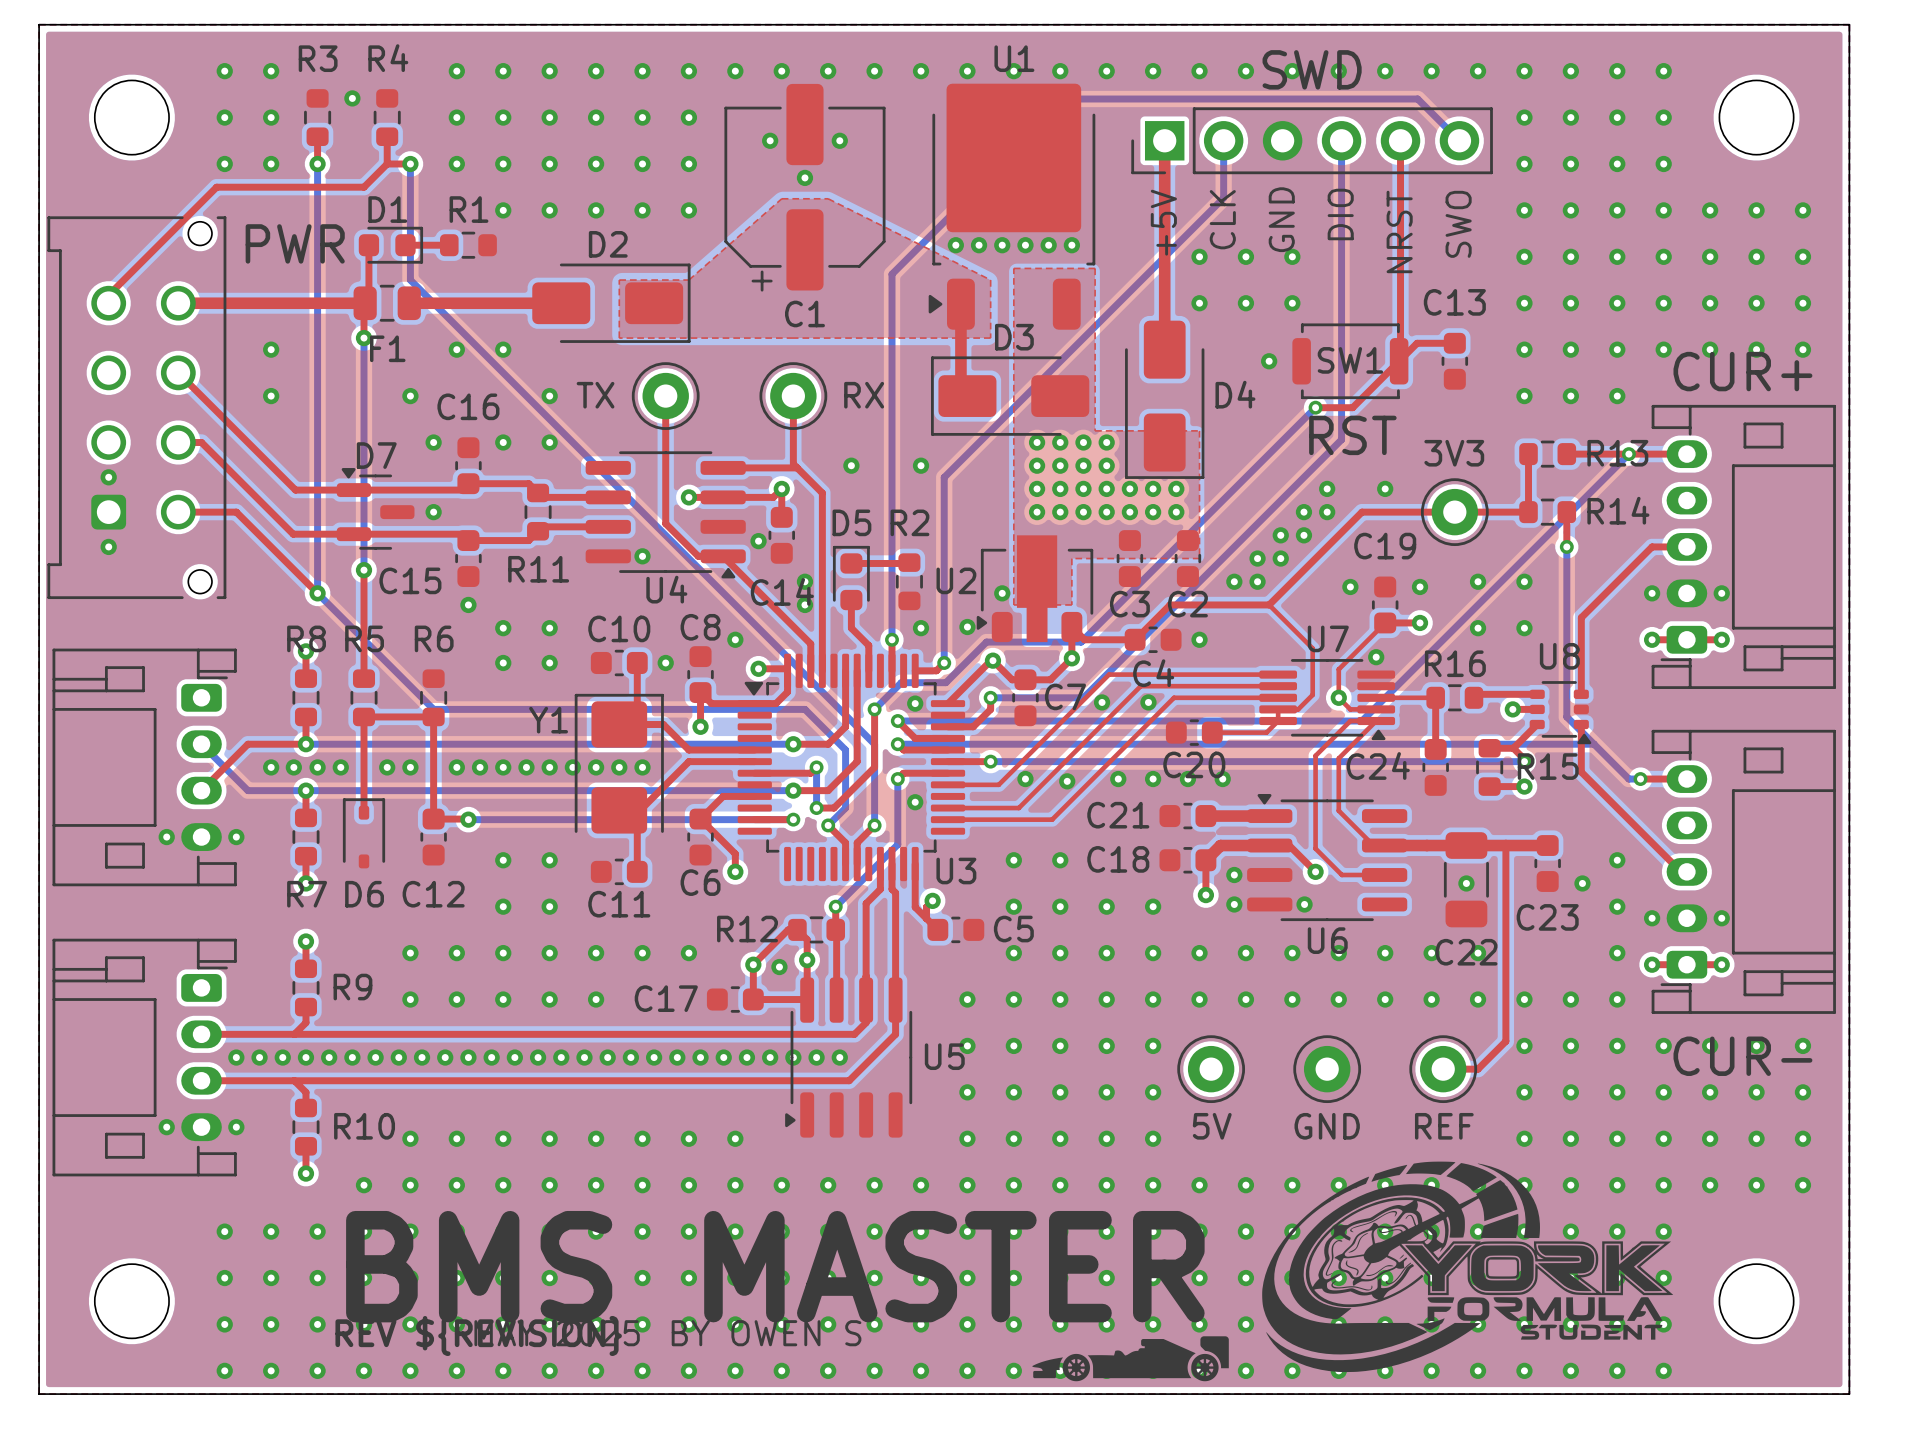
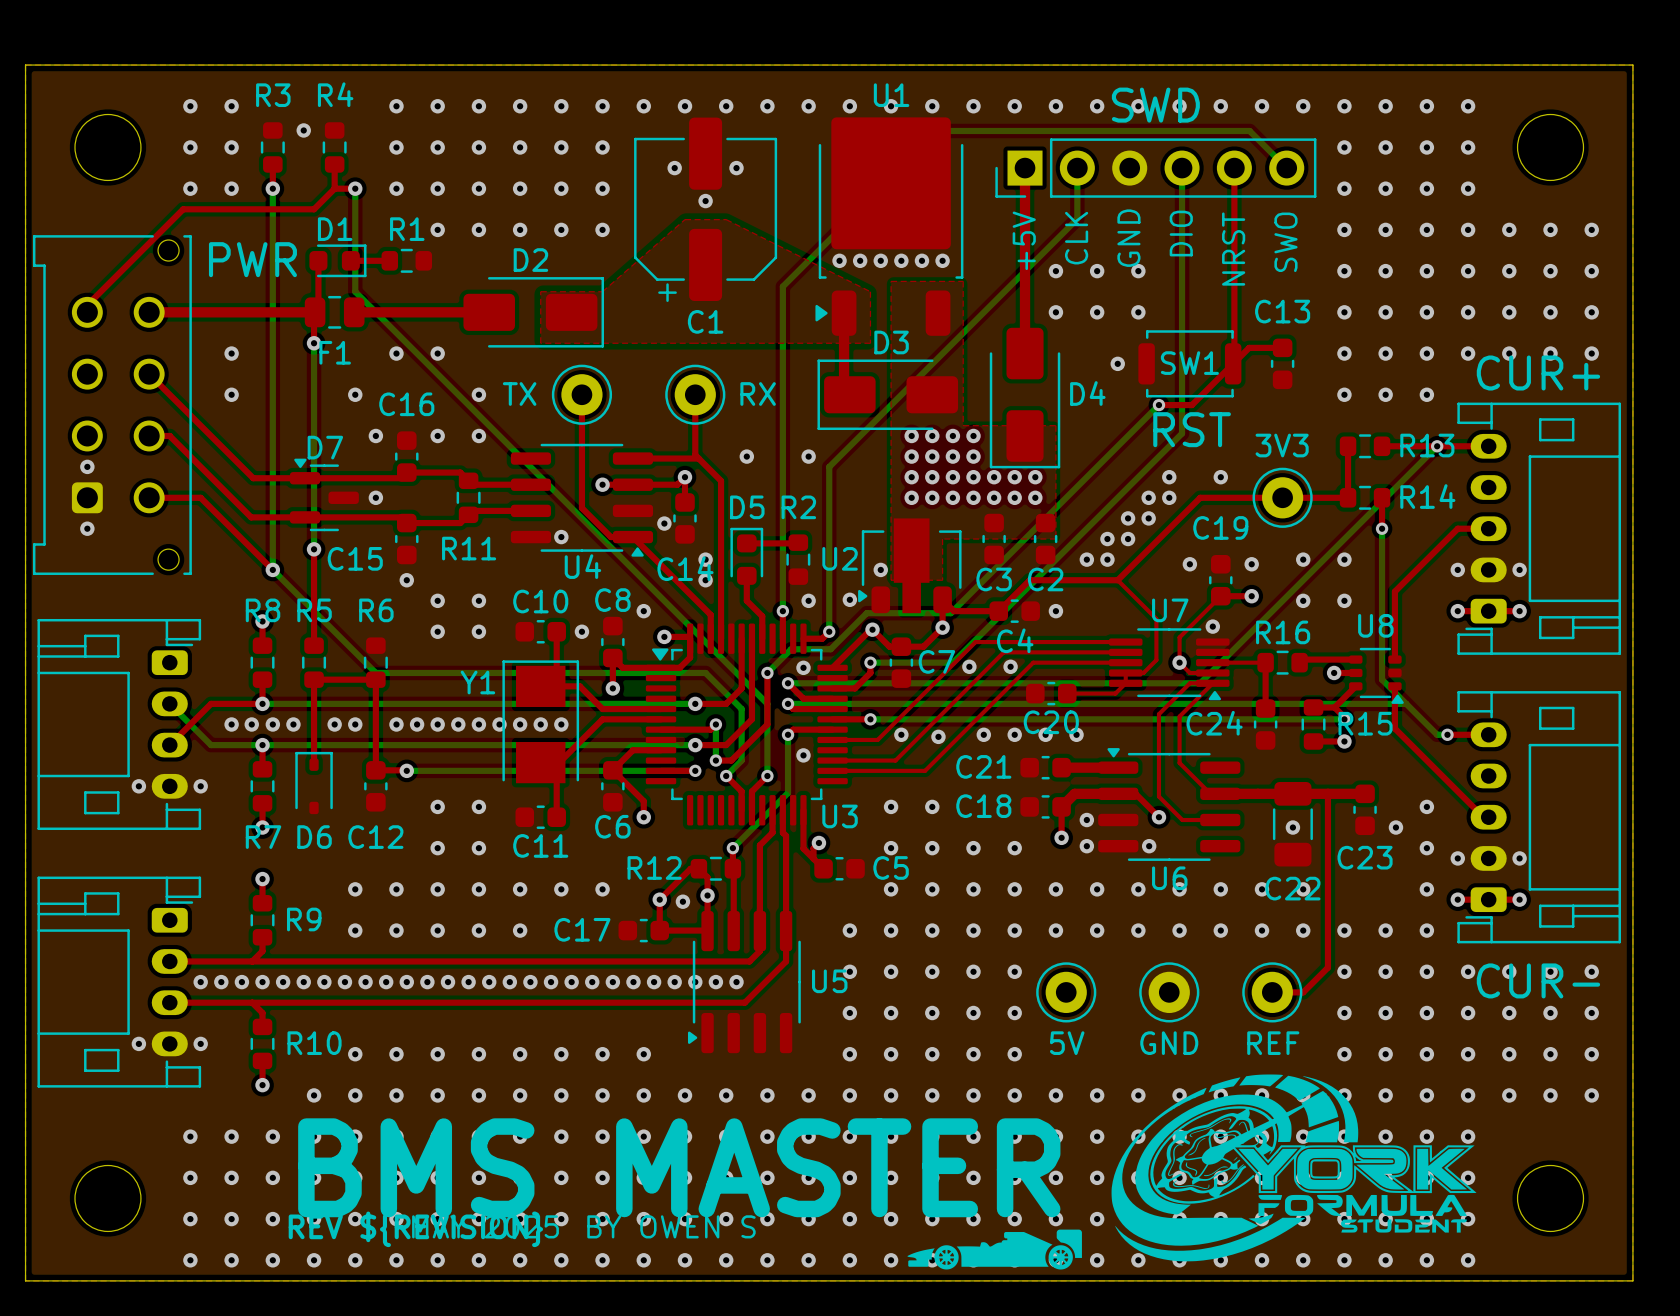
Y1 footprint: [574, 693, 664, 834] -> [502, 660, 580, 784]

